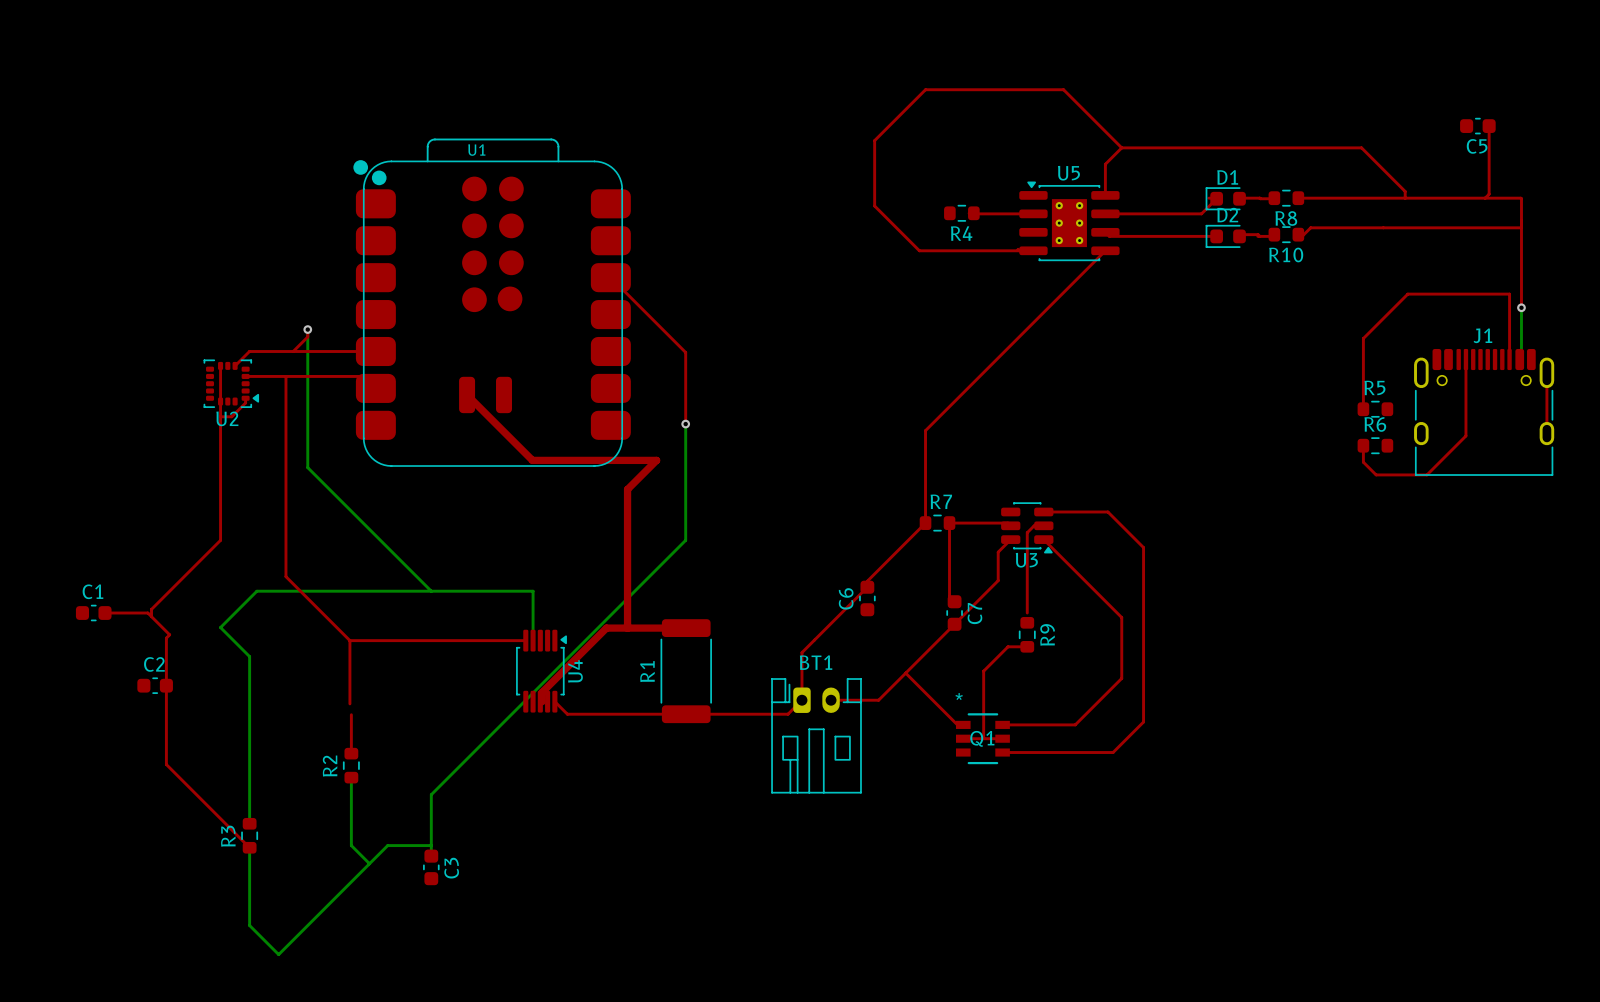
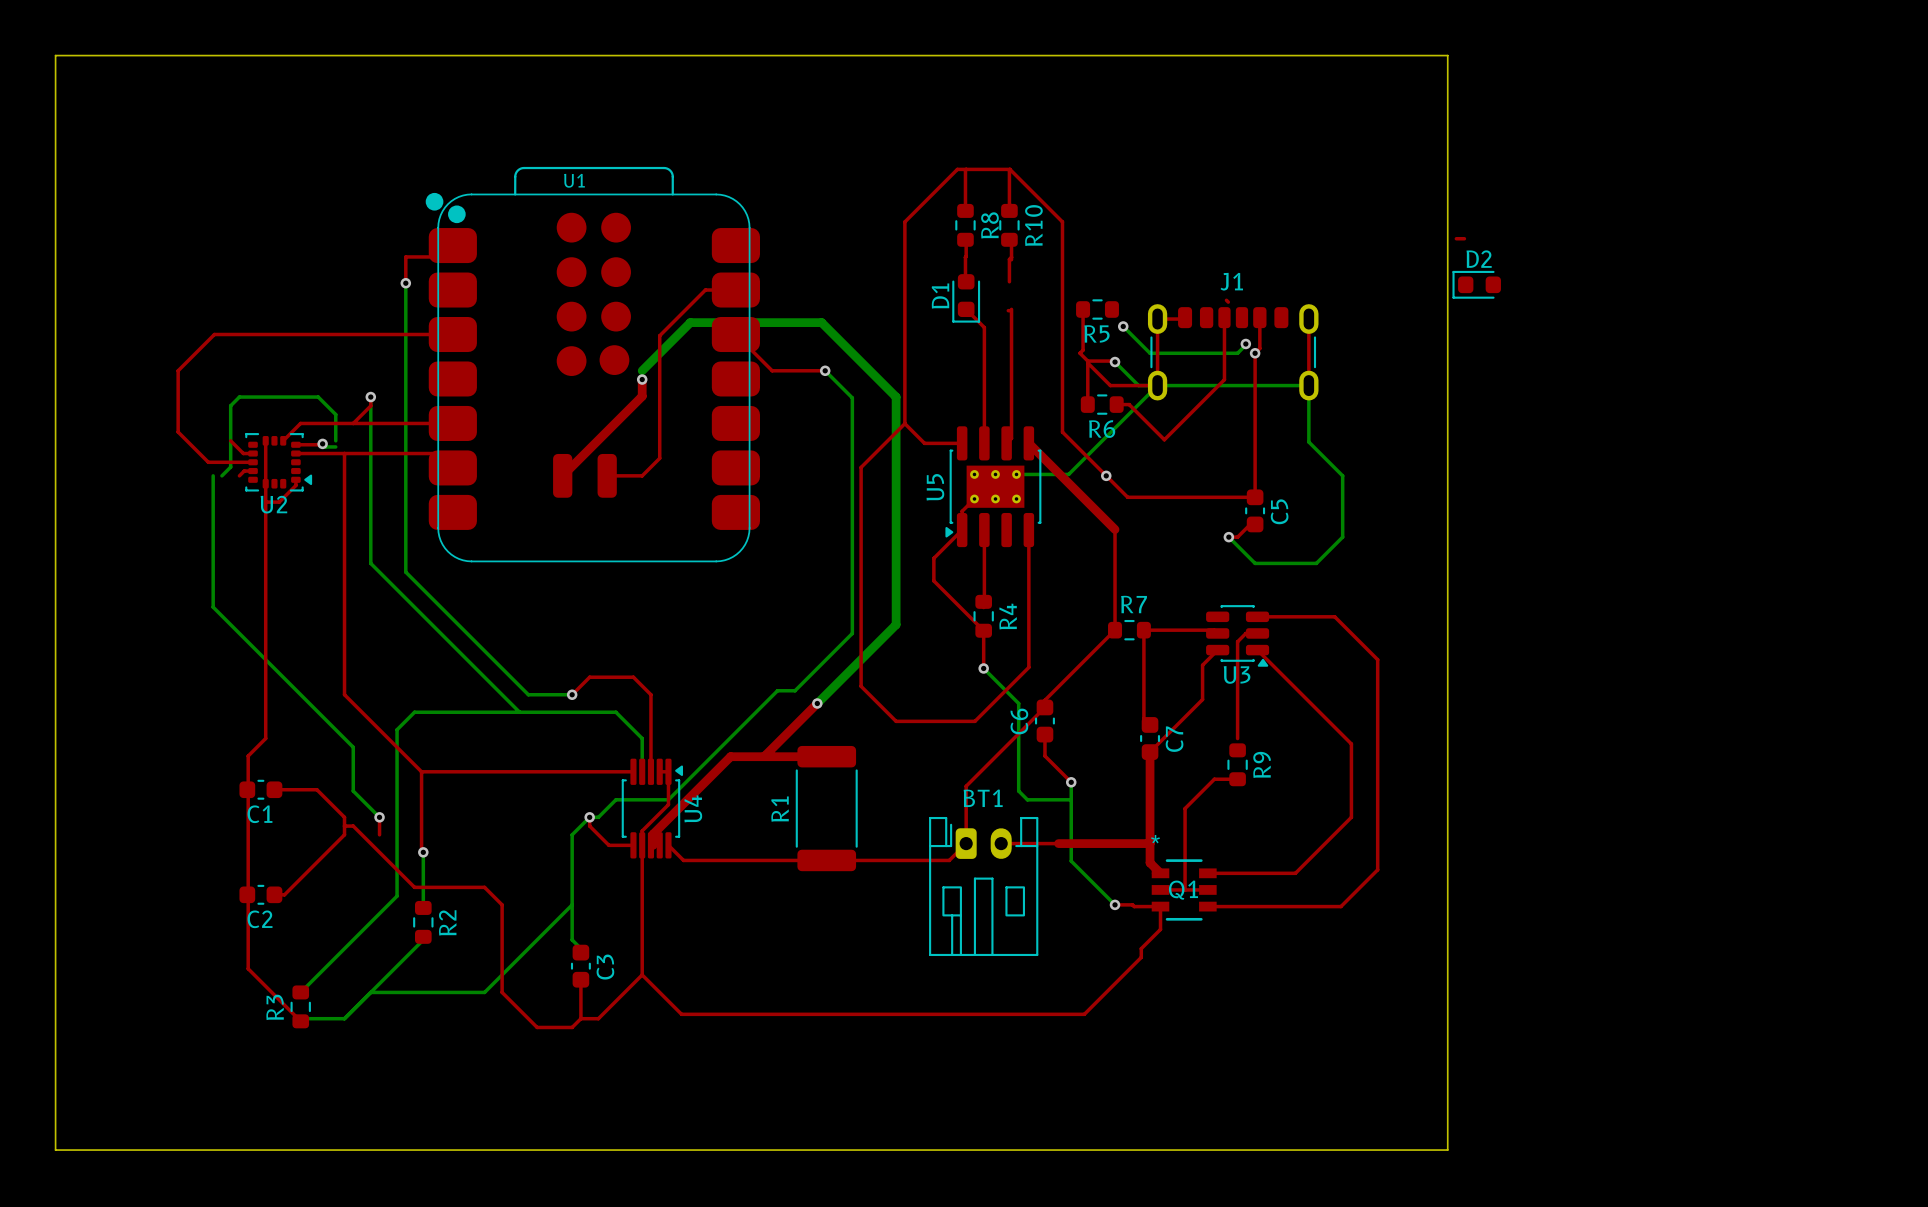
board edge: none -> (55, 55) (1447, 55) (1447, 1150) (55, 1150) (55, 55)
C5 rotation: 0° (1477, 126) -> 90° clockwise (1255, 510)
C5 position: (1477, 126) -> (1255, 510)
top track: (1489, 126) (1489, 194) (1485, 198) -> none
top track: none -> (966, 169) (965, 210)
top track: none -> (1009, 169) (1009, 210)
top track: none -> (1009, 169) (957, 169) (904, 221) (904, 423)
top track: none -> (1009, 169) (1062, 221) (1062, 432) (1127, 497) (1255, 497) (1255, 353) (1259, 348) (1259, 317)
C5 name position: C5 (1477, 146) -> C5 (1279, 511)
top track: (1121, 147) (1063, 89) (925, 89) (874, 140) (874, 206) (919, 250) (1033, 250) -> none
top track: (1121, 147) (1105, 164) (1105, 195) -> none
top track: (1121, 147) (1361, 147) (1405, 191) (1405, 198) -> none
top track: (1216, 198) (1201, 213) (1105, 213) -> none
D1 rotation: 0° (1225, 198) -> 90° counterclockwise (966, 298)
D1 position: (1225, 198) -> (966, 298)
top track: (1239, 198) (1259, 198) -> none
top track: (1259, 198) (1274, 198) -> none
R8 rotation: 0° (1286, 198) -> 90° clockwise (965, 225)
R8 position: (1286, 198) -> (965, 225)
top track: (1298, 198) (1520, 198) (1521, 307) -> none
top track: none -> (966, 239) (965, 257)
top track: none -> (1011, 239) (1011, 259)
top track: none -> (452, 245) (441, 256) (405, 256) (405, 283)
top track: none -> (965, 257) (965, 281)
top track: none -> (1011, 257) (1009, 259) (1009, 281)
R4 rotation: 0° (961, 213) -> 90° clockwise (983, 616)
R4 position: (961, 213) -> (983, 616)
top track: (973, 213) (1033, 213) -> none
R8 name position: R8 (1286, 218) -> R8 (989, 225)
U5 rotation: 0° (1069, 221) -> 90° counterclockwise (993, 486)
U5 position: (1069, 221) -> (993, 486)
top track: (1521, 227) (1310, 227) (1303, 235) (1298, 234) -> none
top track: (1105, 232) (1109, 236) (1216, 236) -> none
R4 name position: R4 (961, 233) -> R4 (1008, 616)
top track: (1239, 234) (1258, 234) (1259, 236) -> none
R10 rotation: 0° (1286, 234) -> 90° clockwise (1009, 225)
R10 position: (1286, 234) -> (1009, 225)
bottom track: none -> (405, 283) (405, 572) (528, 694) (572, 694)
via: none -> (405, 283)
top track: (1257, 236) (1274, 236) -> none
top track: none -> (735, 290) (705, 290) (659, 335) (659, 458) (642, 475) (607, 475)
top track: (1105, 250) (925, 430) (925, 439) -> (1028, 443) (1115, 529)
R10 name position: R10 (1286, 254) -> R10 (1033, 225)
top track: none -> (966, 309) (984, 327) (984, 443)
top track: none -> (1011, 309) (1011, 438) (1006, 443)
top track: none -> (1083, 309) (1083, 350) (1079, 353) (1087, 361)
top track: none -> (1008, 310) (1009, 310)
top track: none -> (1308, 316) (1308, 389)
top track: none -> (1185, 317) (1157, 319) (1157, 385) (1110, 385) (1087, 362)
top track: none -> (1224, 317) (1224, 379) (1164, 439) (1129, 404) (1116, 404)
bottom track: none -> (1123, 326) (1150, 353) (1237, 353) (1245, 343)
via: none -> (1123, 326)
top track: none -> (452, 334) (214, 334) (178, 370) (178, 432) (208, 462) (253, 462)
via: none -> (1245, 343)
via: none -> (1255, 353)
top track: none -> (1087, 361) (1087, 404)
top track: none -> (1087, 361) (1115, 362)
bottom track: none -> (1115, 362) (1138, 385) (1308, 385) (1308, 442) (1342, 475) (1342, 537) (1316, 563) (1255, 563) (1228, 537)
via: none -> (1115, 362)
bottom track: none -> (642, 370) (690, 322) (821, 322) (896, 397) (896, 624) (817, 703)
top track: (640, 307) (685, 352) (685, 426) -> (772, 370) (825, 370)
bottom track: none -> (825, 370) (852, 397) (852, 633) (795, 690) (777, 690) (668, 799) (615, 799) (598, 817) (589, 817) (572, 834) (572, 939) (580, 948)
via: none -> (825, 370)
bottom track: (1521, 307) (1521, 358) -> none
via: (1521, 307) -> none
via: none -> (642, 379)
bottom track: none -> (1157, 385) (1068, 474) (1016, 474)
J1 footprint: [1414, 348, 1555, 476] -> [1147, 304, 1319, 401]
top track: none -> (904, 423) (861, 467) (861, 686) (896, 721) (974, 721) (1028, 667) (1028, 530)
top track: none -> (904, 423) (924, 443) (962, 443)
top track: (1465, 359) (1465, 435) (1427, 474) (1376, 474) (1363, 462) (1363, 445) -> none
top track: (1509, 359) (1509, 294) (1407, 294) (1363, 338) (1363, 409) -> none
top track: none -> (230, 440) (243, 453) (253, 453)
bottom track: none -> (335, 440) (335, 414) (318, 397) (239, 397) (230, 405) (230, 467) (221, 475)
top track: none -> (322, 443) (295, 444)
bottom track: none -> (322, 443) (325, 446) (335, 446)
via: none -> (322, 443)
top track: (1546, 372) (1546, 433) -> none
R5 name position: R5 (1374, 387) -> R5 (1096, 333)
top track: none -> (253, 471) (244, 471) (239, 475)
bottom track: none -> (213, 475) (213, 607) (353, 747) (353, 791) (379, 817)
top track: (467, 394) (532, 460) (656, 460) (627, 489) (627, 628) -> (562, 475) (642, 396) (642, 379)
via: none -> (1106, 475)
R5 position: (1375, 409) -> (1097, 309)
top track: none -> (974, 498) (962, 511) (962, 530) (933, 558) (933, 580) (983, 630) (983, 668)
bottom track: (685, 424) (685, 540) (474, 751) -> none
via: (685, 424) -> none
R6 name position: R6 (1375, 424) -> R6 (1102, 429)
top track: none -> (1255, 524) (1250, 524) (1237, 537) (1228, 537)
top track: none -> (984, 530) (983, 601)
via: none -> (1228, 537)
R6 position: (1375, 445) -> (1102, 404)
top track: (220, 540) (151, 609) (151, 616) -> none
bottom track: none -> (983, 668) (1018, 703) (1018, 791) (1027, 799) (1071, 799)
via: none -> (983, 668)
top track: none -> (572, 694) (589, 677) (633, 677) (650, 694) (650, 771)
via: none -> (572, 694)
top track: none -> (817, 703) (764, 756)
via: none -> (817, 703)
C1 name position: C1 (92, 591) -> C1 (259, 814)
bottom track: (344, 591) (256, 591) (220, 627) (249, 656) (249, 823) -> (414, 712) (397, 729) (397, 896) (300, 992)
bottom track: (511, 591) (533, 591) (533, 613) -> (615, 712) (642, 738)
top track: none -> (1044, 734) (1044, 756) (1071, 782)
C1 position: (93, 613) -> (260, 789)
top track: (105, 613) (147, 613) (169, 634) (166, 638) (166, 764) (206, 804) -> (265, 650) (265, 738) (248, 756) (248, 968)
top track: (954, 624) (878, 700) -> (1150, 843) (1058, 843)
top track: none -> (1150, 752) (1150, 862) (1160, 873)
top track: none -> (659, 771) (668, 771) (668, 804) (642, 830) (642, 974)
bottom track: none -> (1071, 782) (1071, 861) (1115, 904)
via: none -> (1071, 782)
top track: none -> (274, 789) (316, 789) (344, 817) (344, 834) (284, 894) (274, 894)
C2 name position: C2 (154, 664) -> C2 (260, 919)
top track: (905, 673) (957, 724) -> none
top track: none -> (379, 817) (379, 834)
via: none -> (379, 817)
top track: none -> (589, 817) (589, 826) (608, 845) (633, 845)
via: none -> (589, 817)
C2 position: (155, 685) -> (260, 894)
top track: none -> (344, 826) (353, 826) (414, 887) (484, 887) (502, 904) (502, 992) (537, 1027) (572, 1027) (580, 1018)
bottom track: none -> (423, 852) (423, 904)
via: none -> (423, 852)
top track: (351, 714) (351, 753) -> none
top track: none -> (1115, 904) (1160, 906) (1160, 929) (1141, 948) (1141, 957) (1084, 1014) (681, 1014) (642, 974)
via: none -> (1115, 904)
R2 name position: R2 (330, 766) -> R2 (447, 922)
bottom track: (351, 780) (351, 845) (369, 863) -> (423, 939) (344, 1018) (309, 1018)
bottom track: (431, 794) (431, 852) -> (519, 957) (484, 992) (370, 992)
top track: none -> (642, 974) (598, 1018) (580, 1018)
top track: none -> (580, 979) (580, 1018)
bottom track: (431, 845) (387, 845) (278, 954) (249, 925) (249, 852) -> none
C3 position: (431, 867) -> (580, 966)

